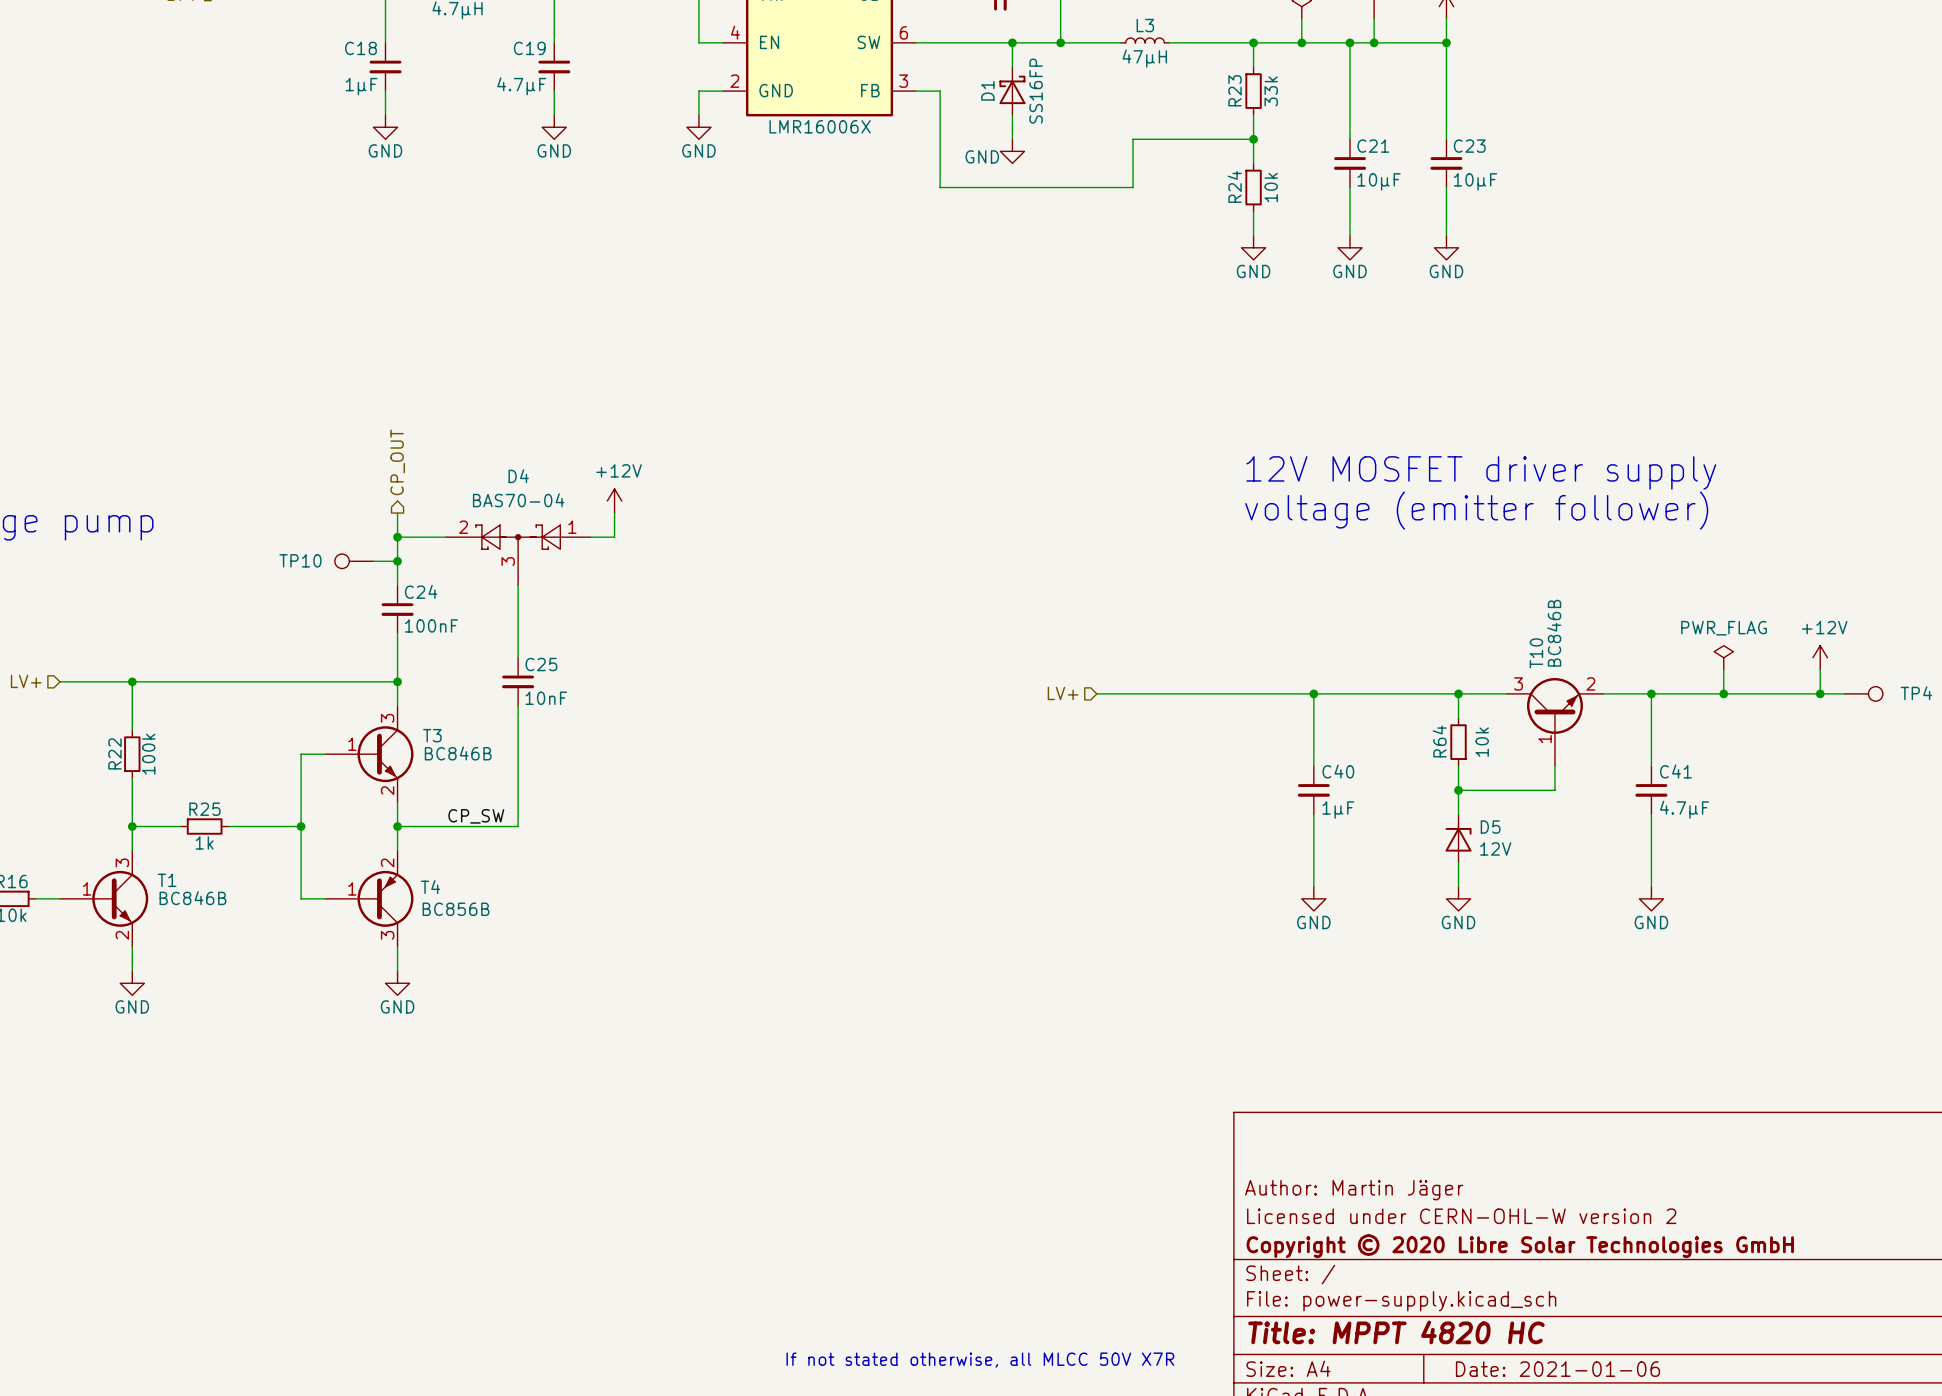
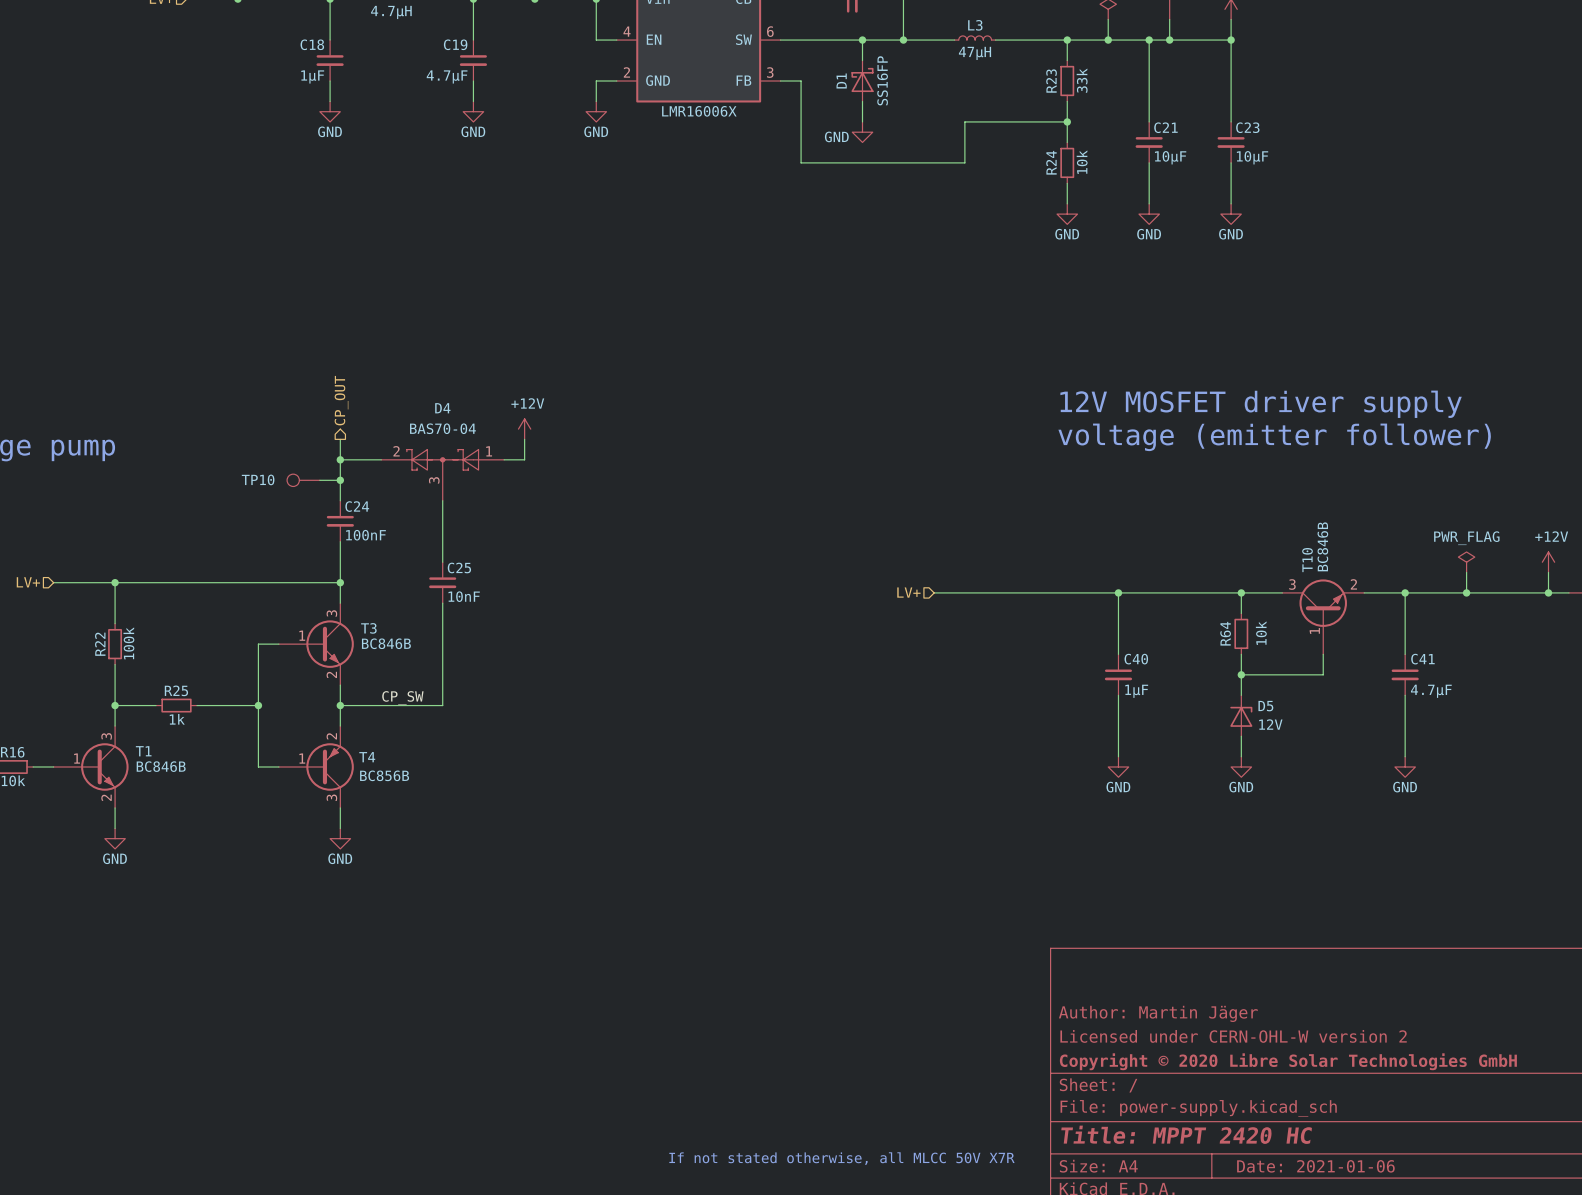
title block: Title: MPPT 4820 HC (1396, 1332) -> Title: MPPT 2420 HC (1186, 1134)

